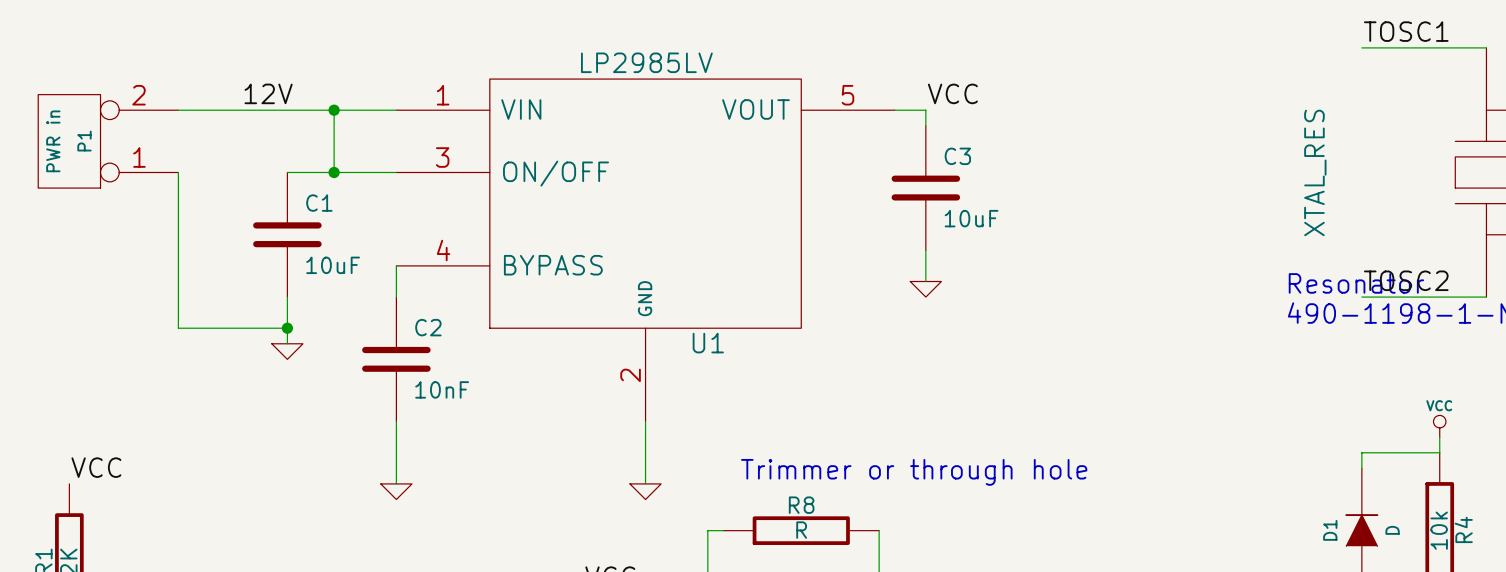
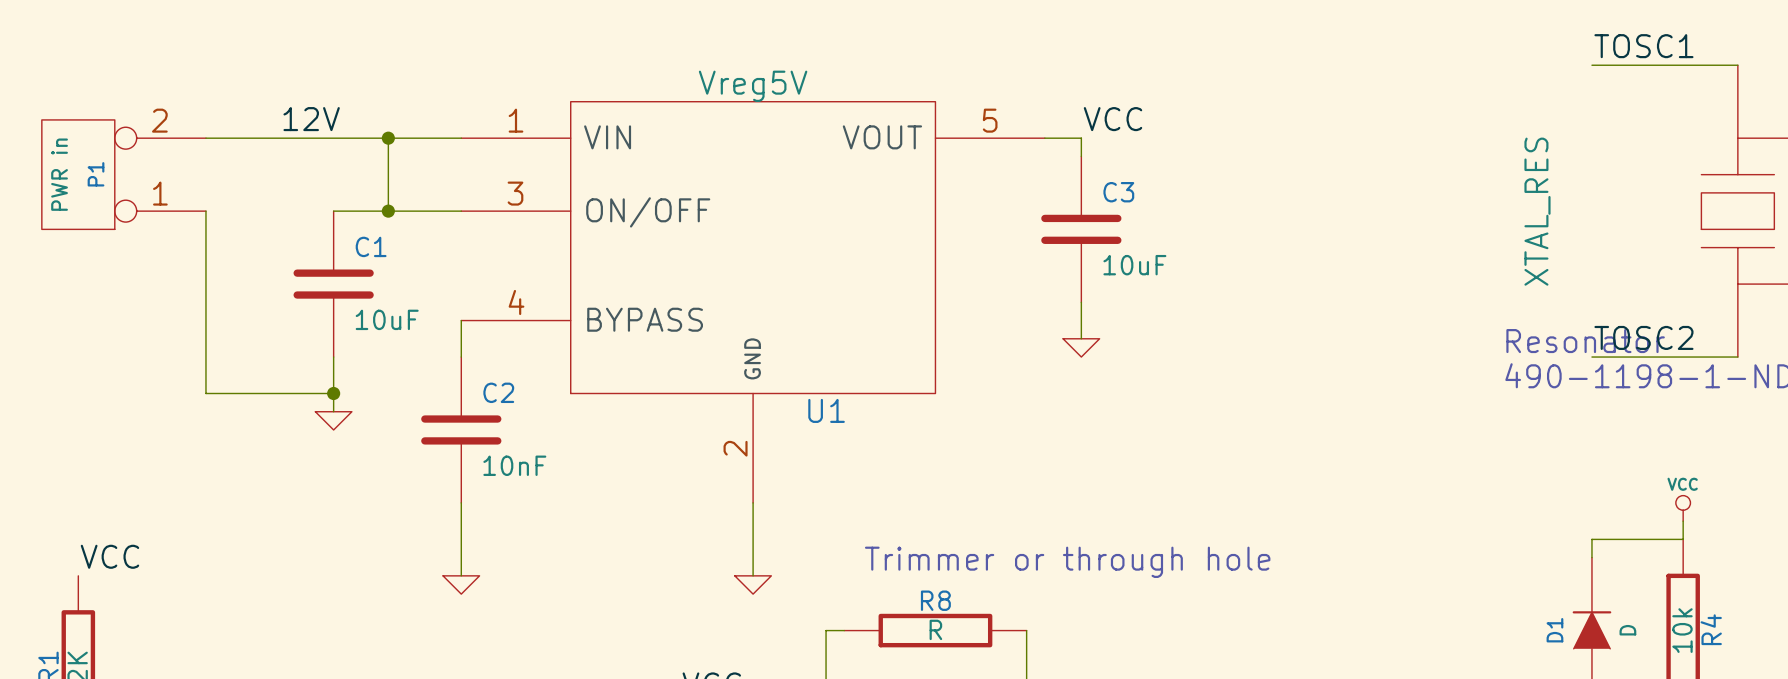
U1 value: LP2985LV (646, 62) -> Vreg5V (753, 86)

